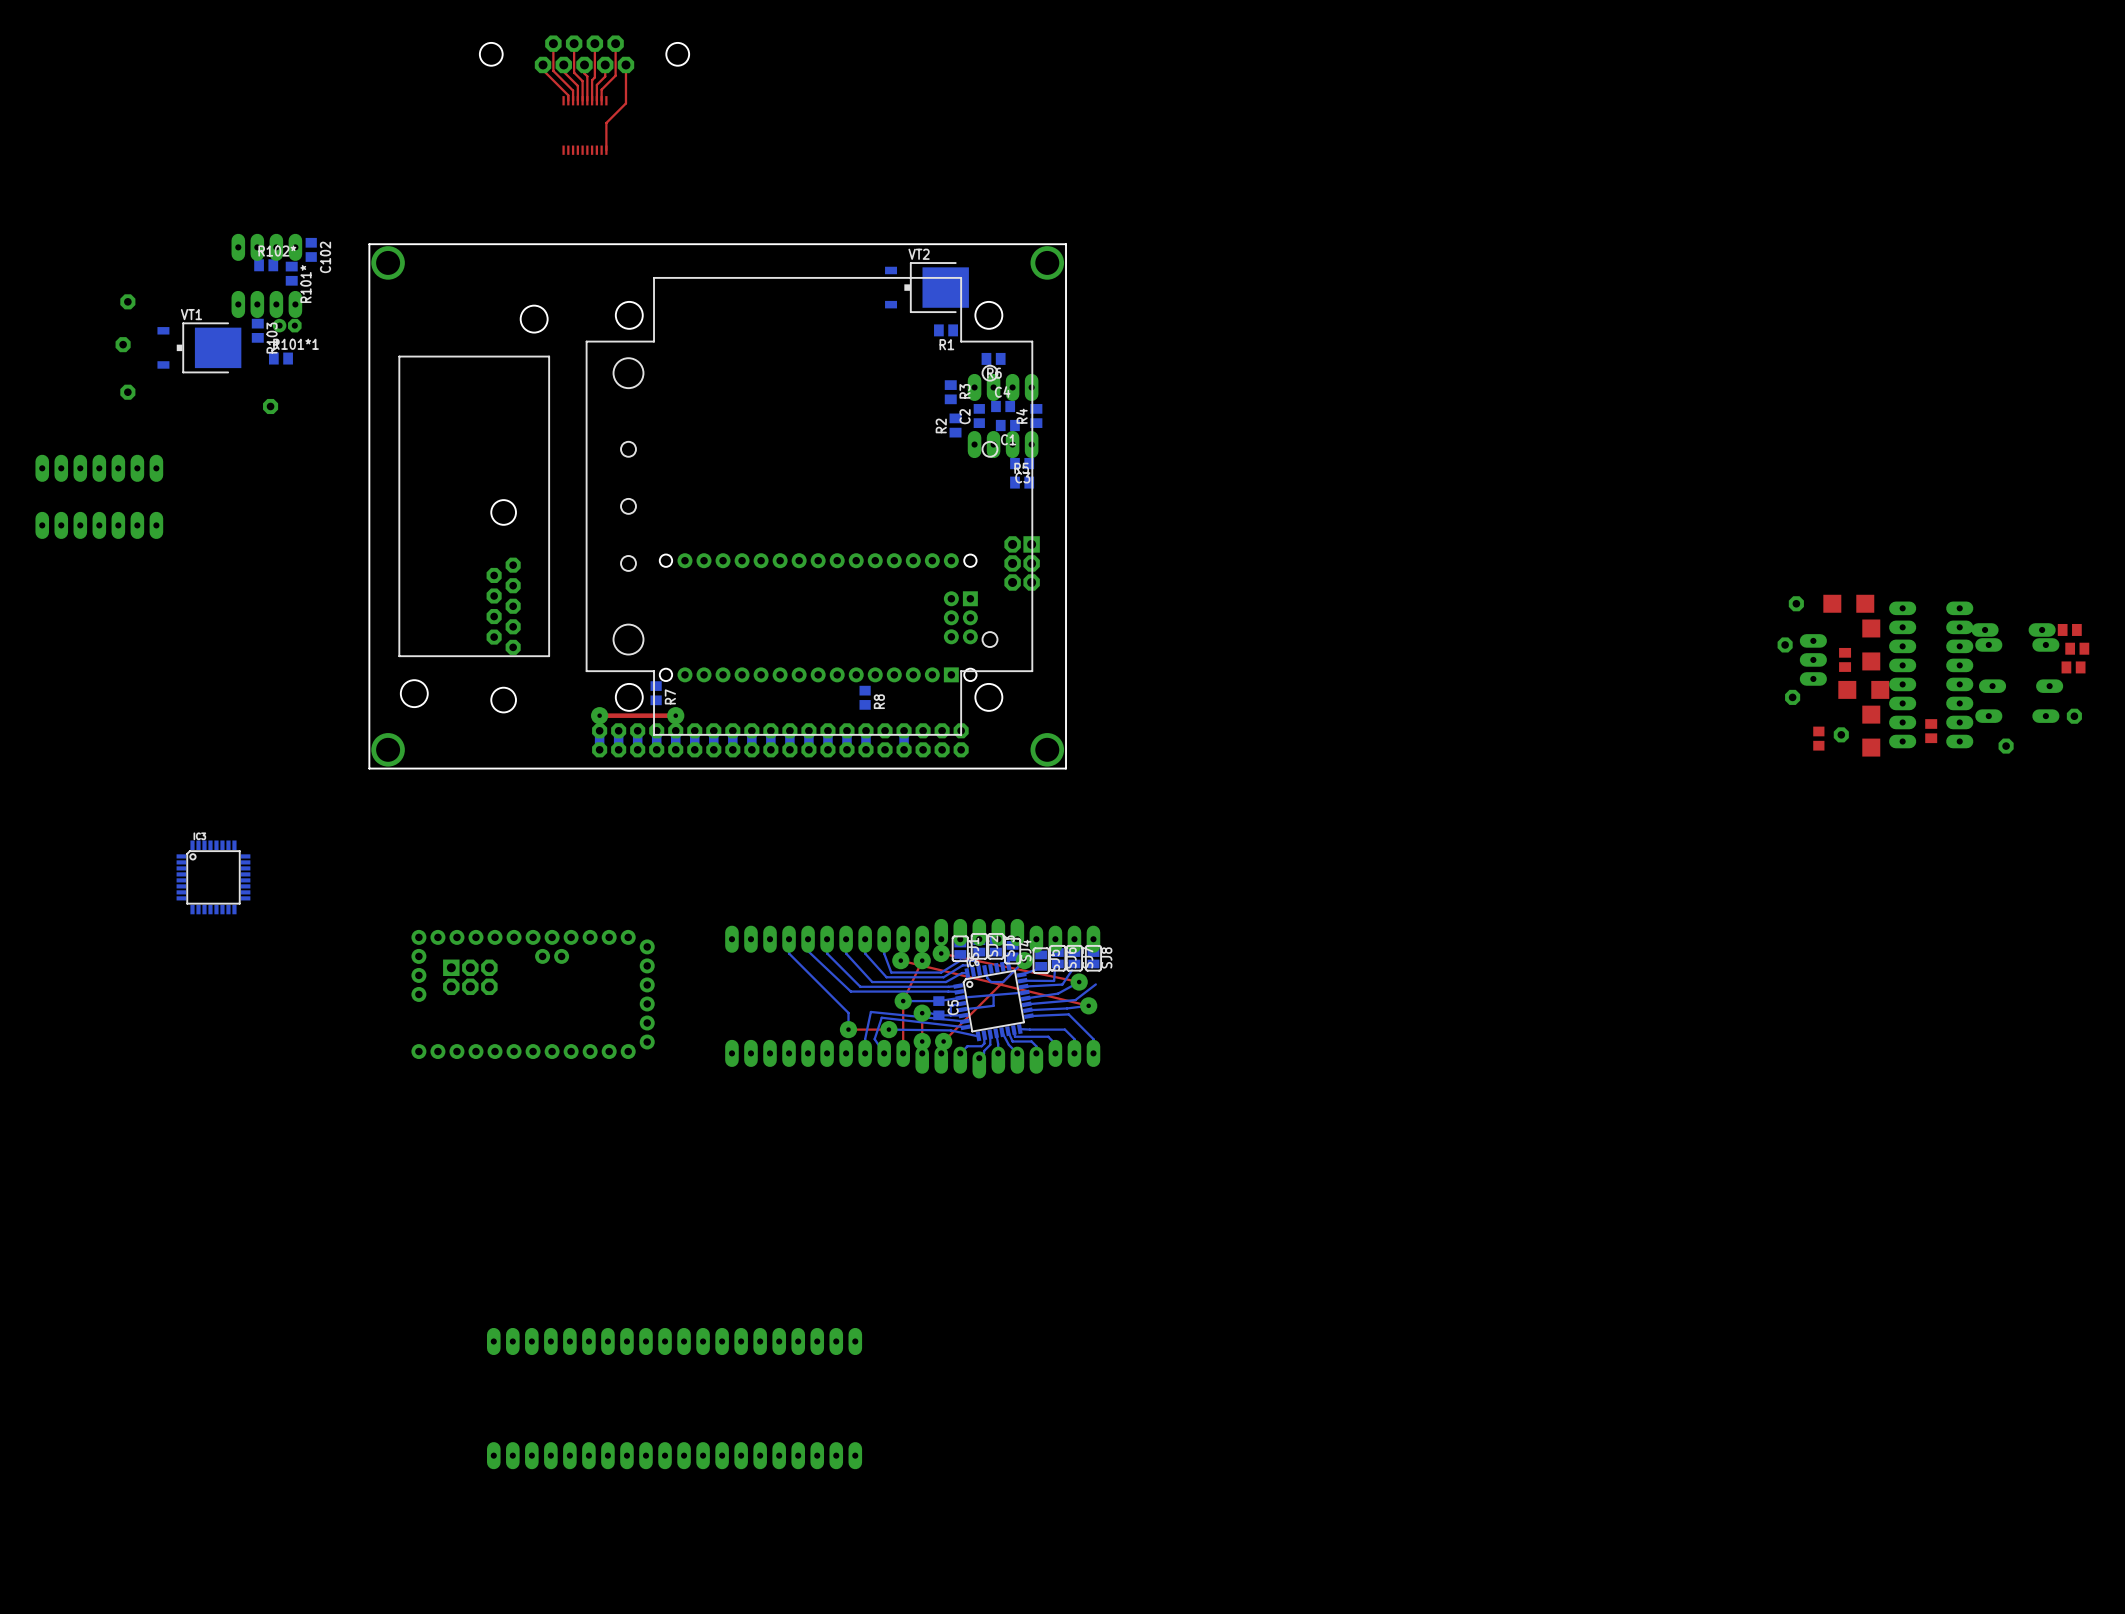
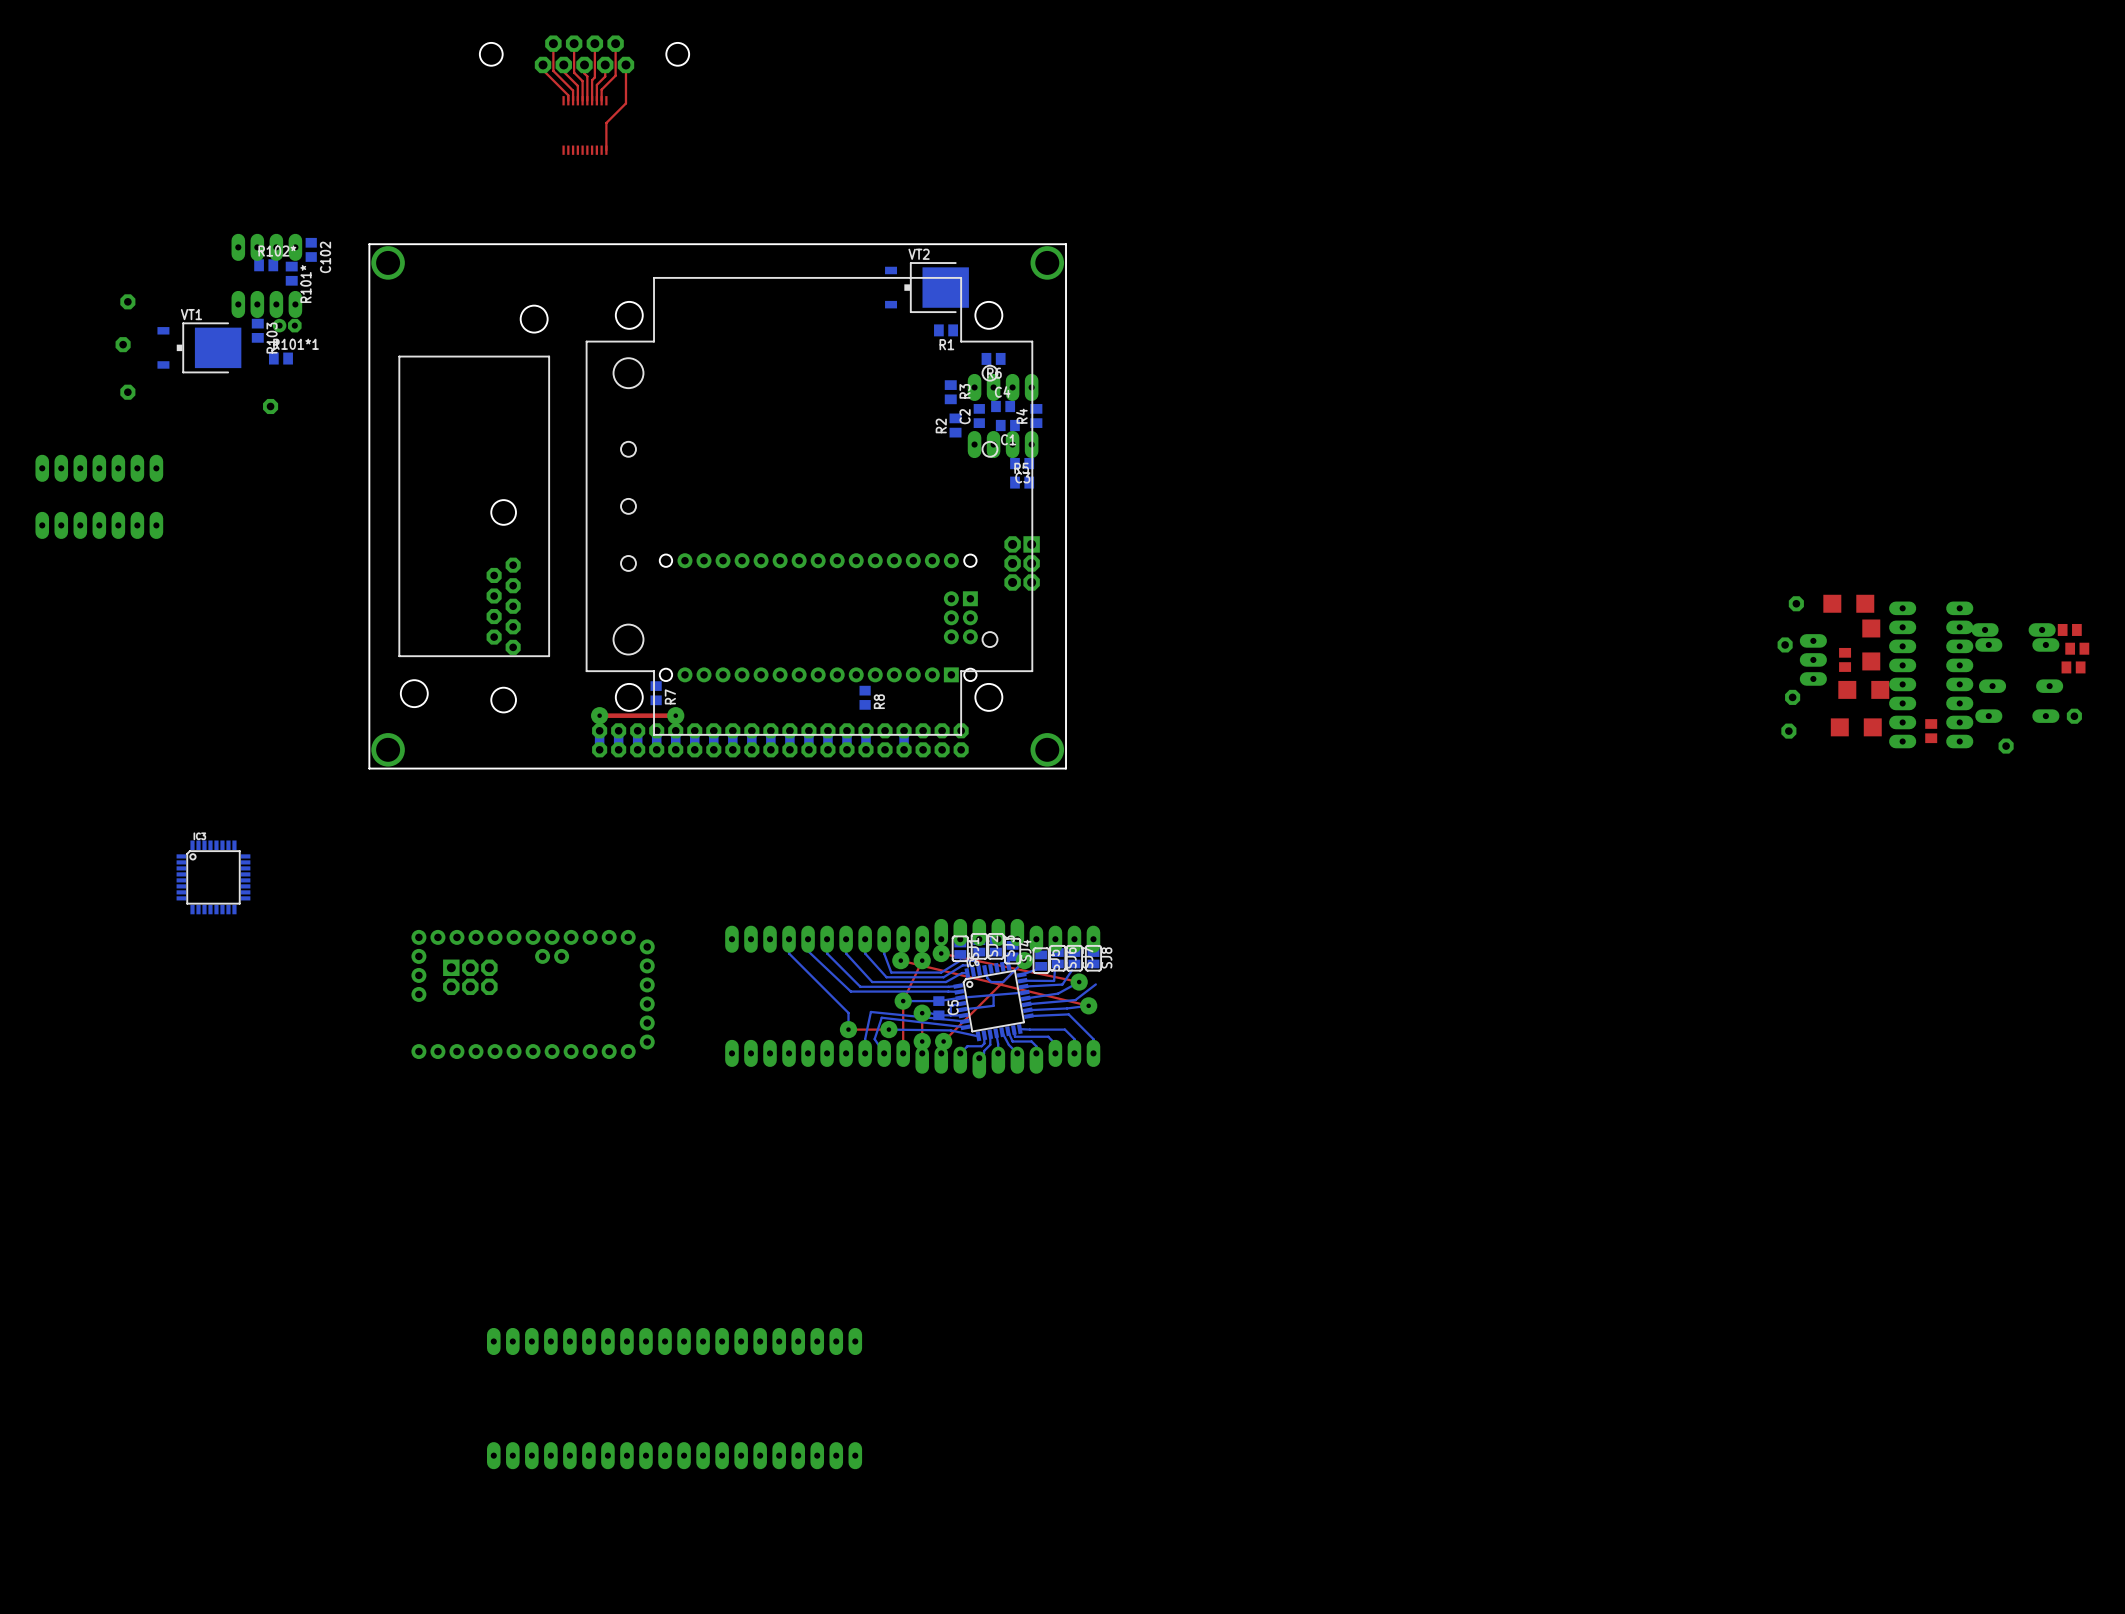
part rotation: 0° (1871, 731) -> 90° clockwise (1856, 727)
part position: (1841, 734) -> (1788, 731)
part: (1818, 738) -> none

